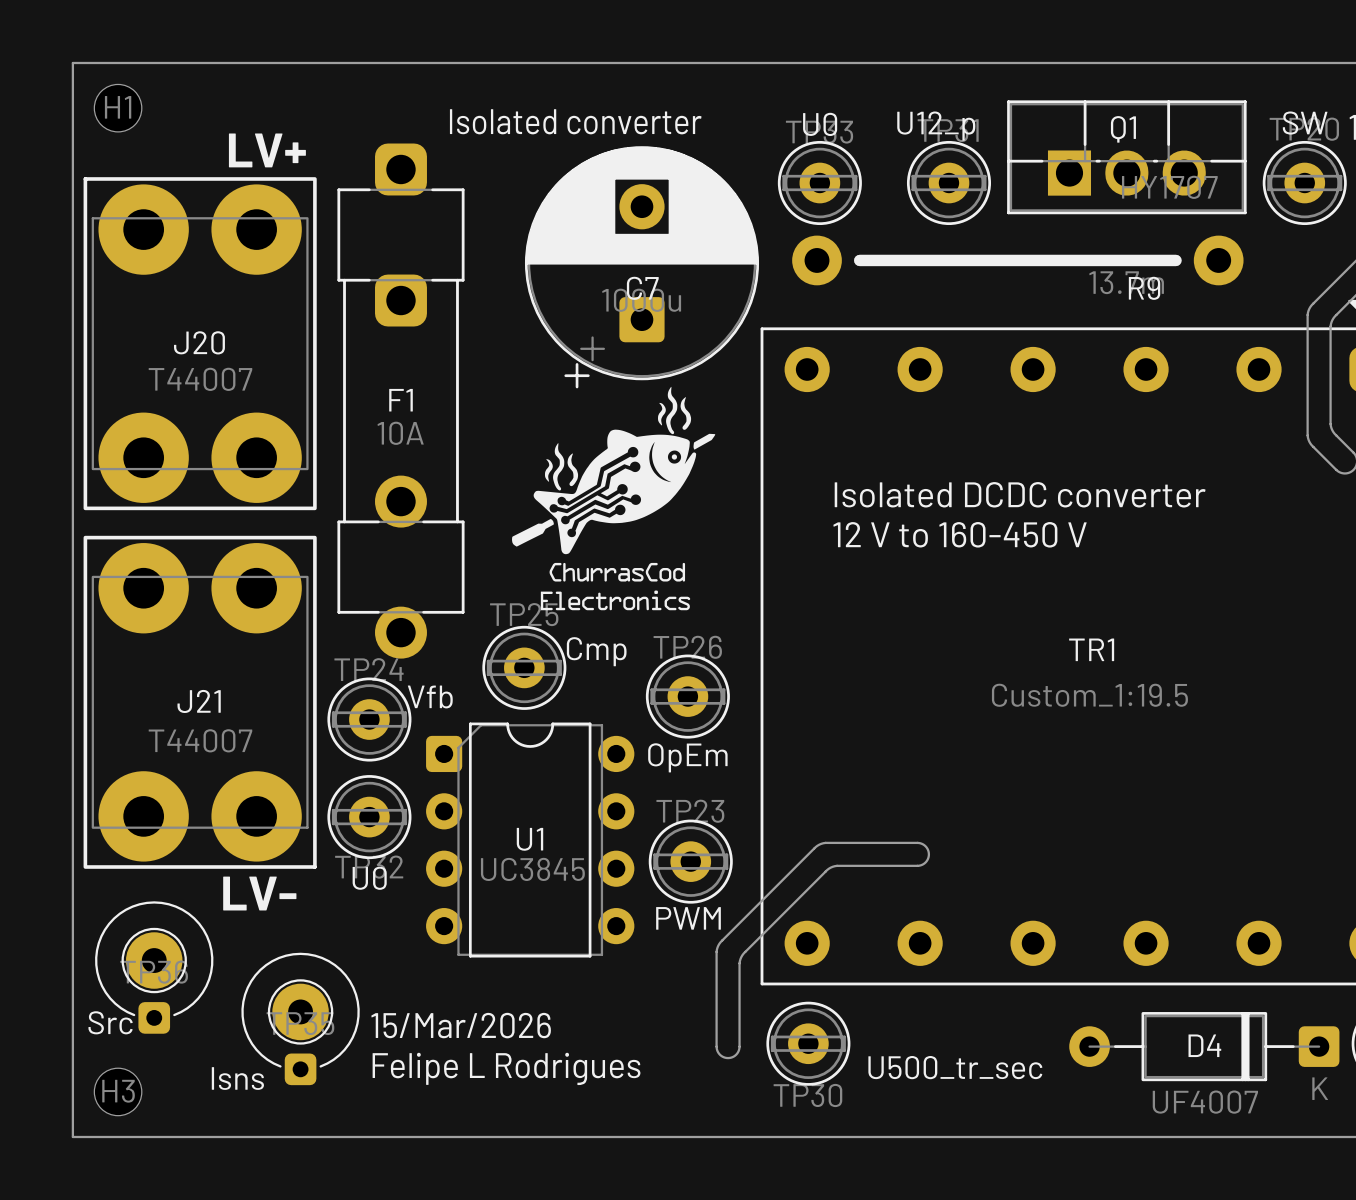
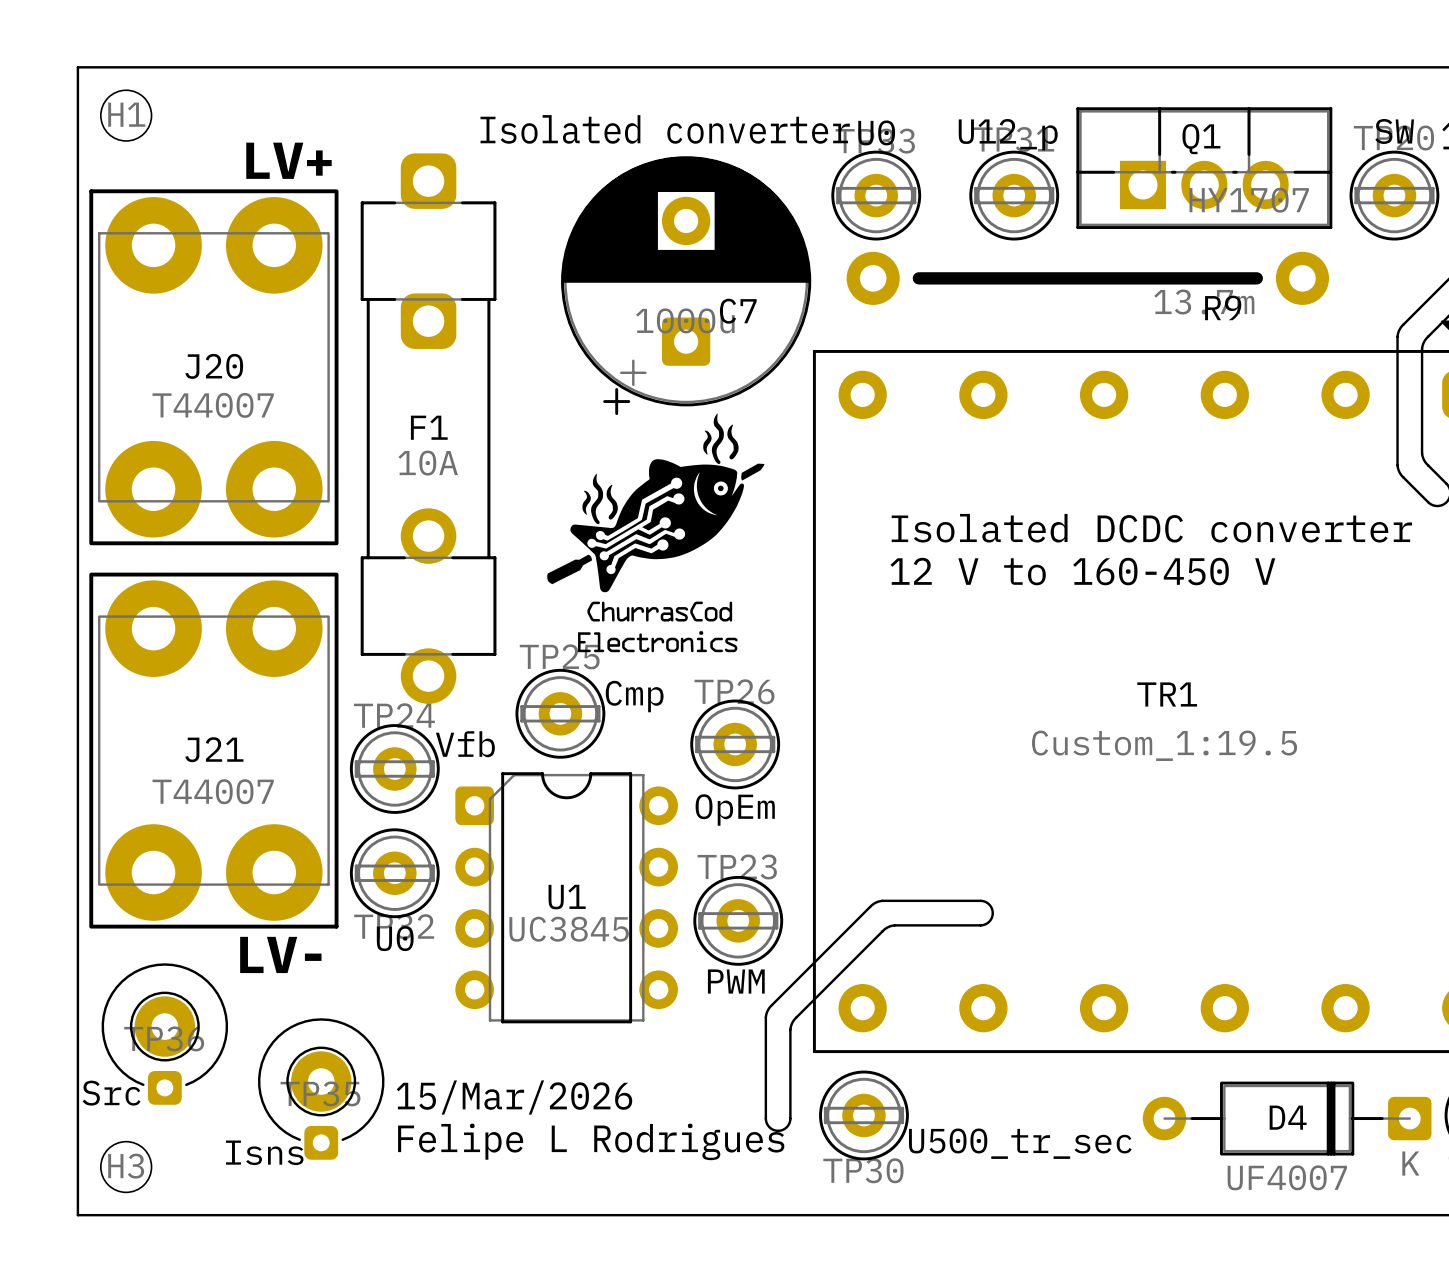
C7 name position: C7 (642, 288) -> C7 (738, 311)

